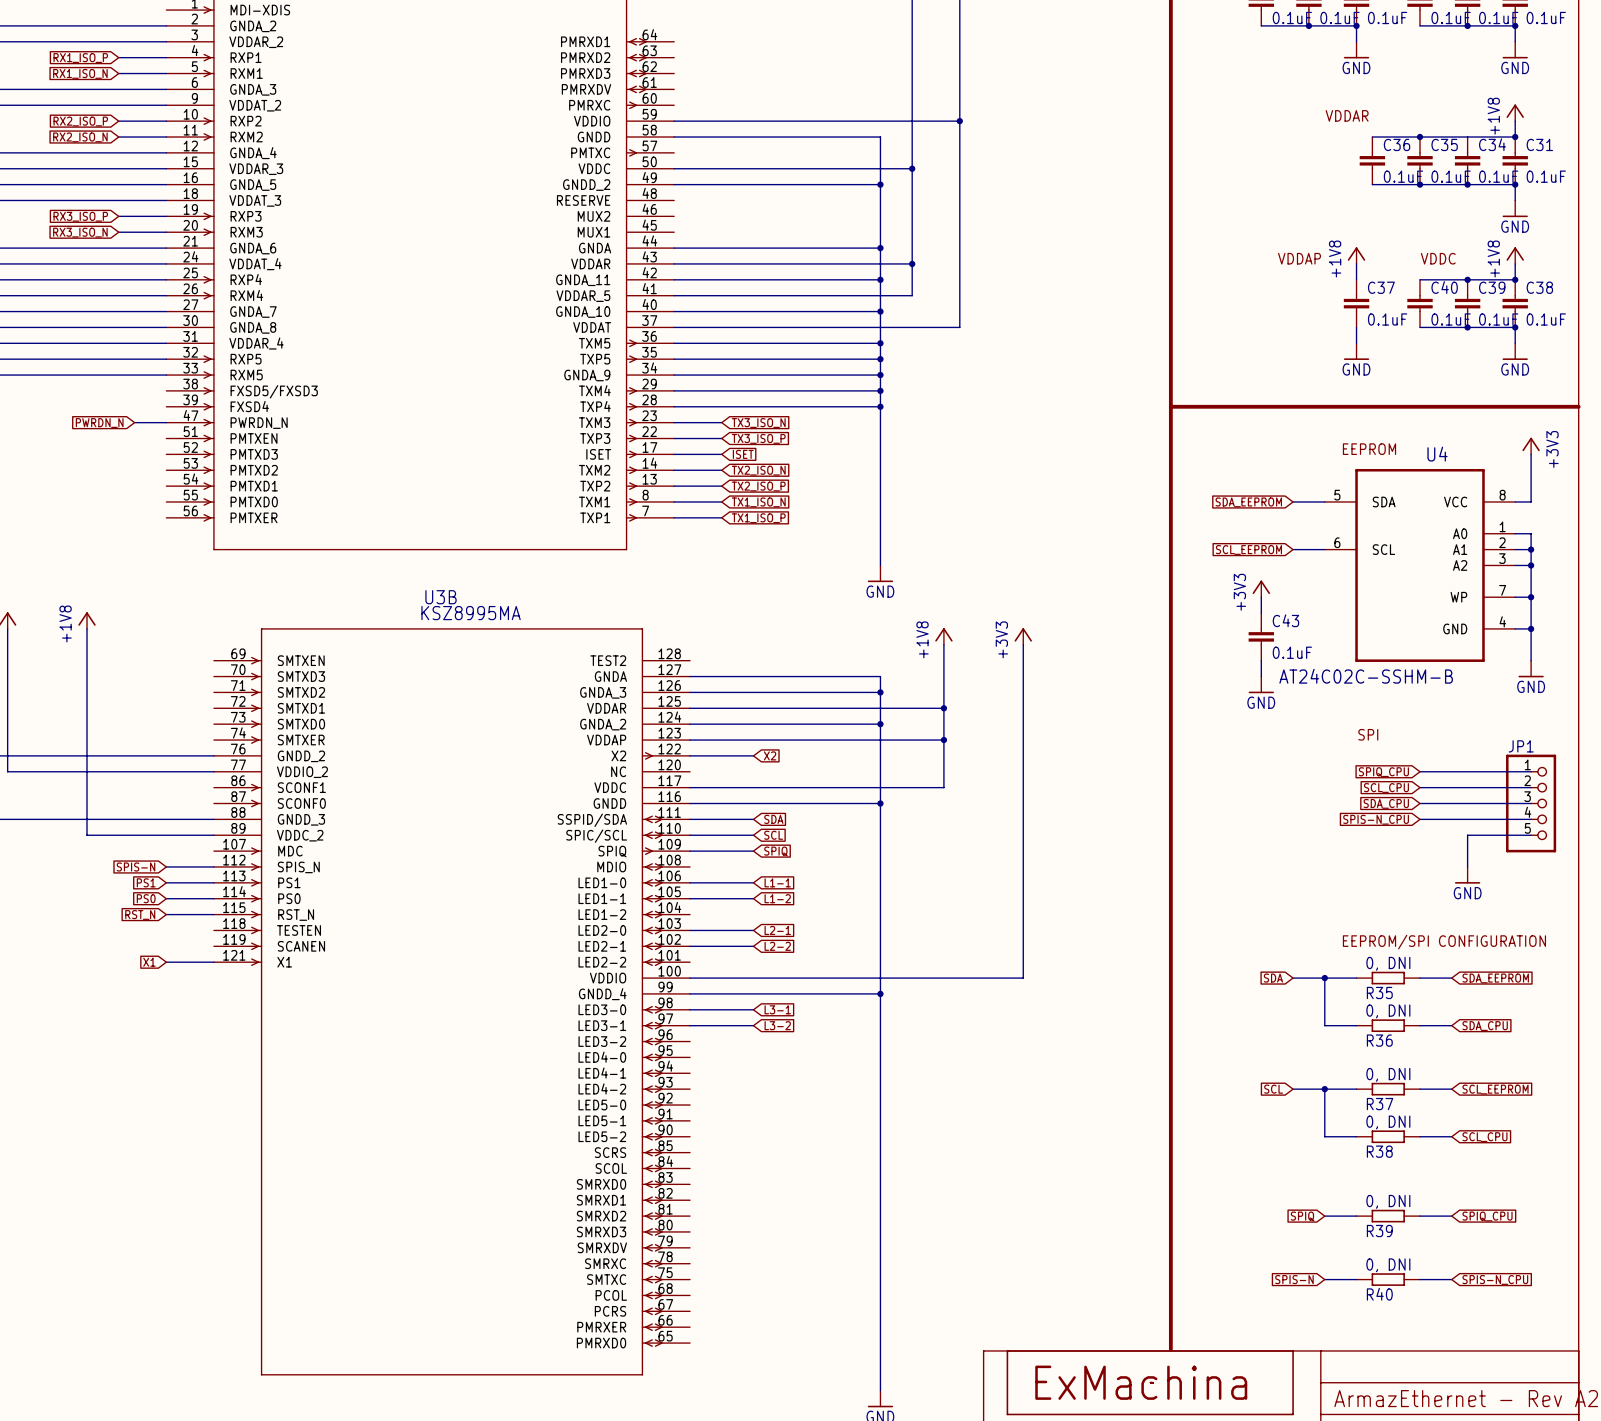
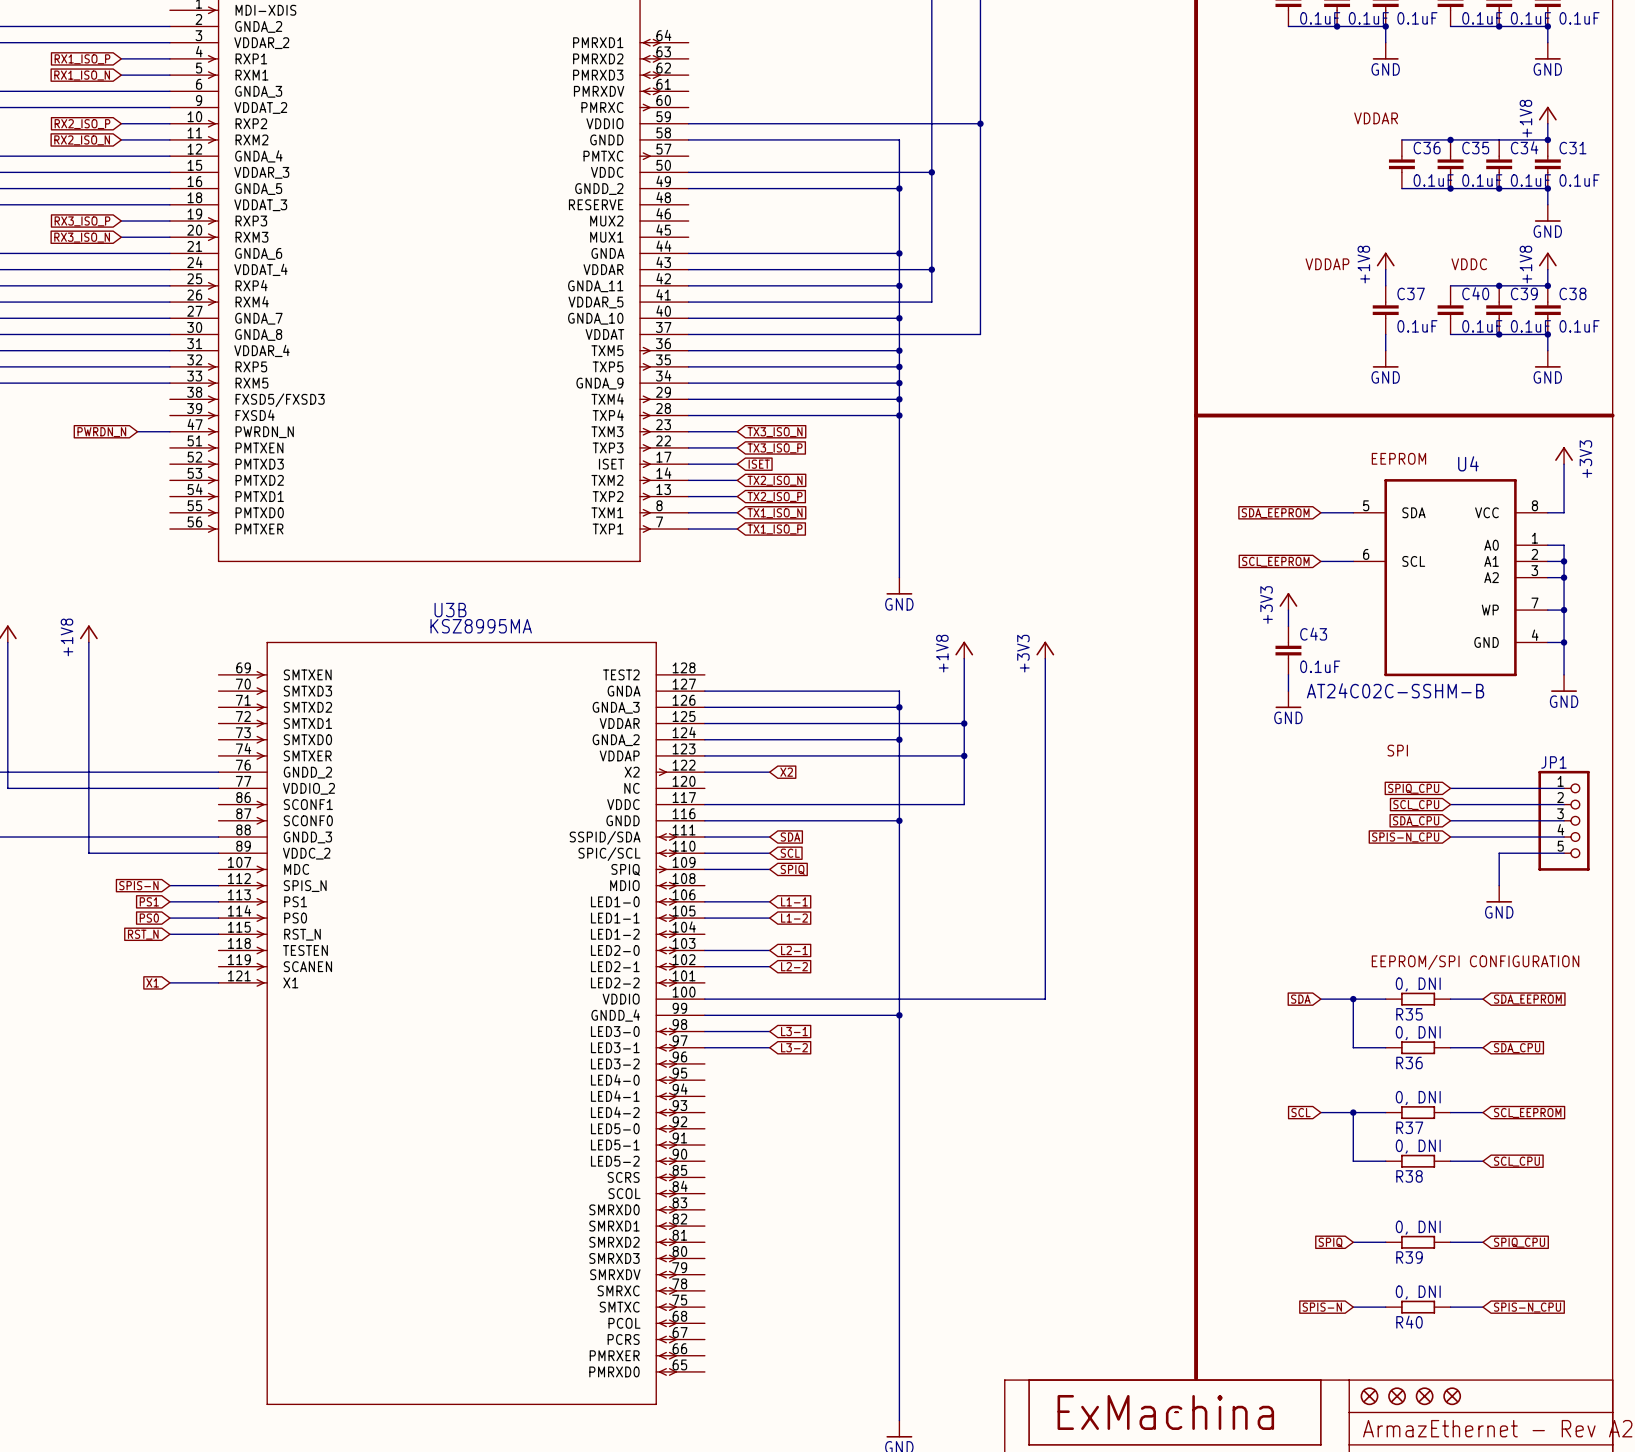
part: none -> (1369, 1396)
part: none -> (1397, 1396)
part: none -> (1424, 1396)
part: none -> (1452, 1396)

